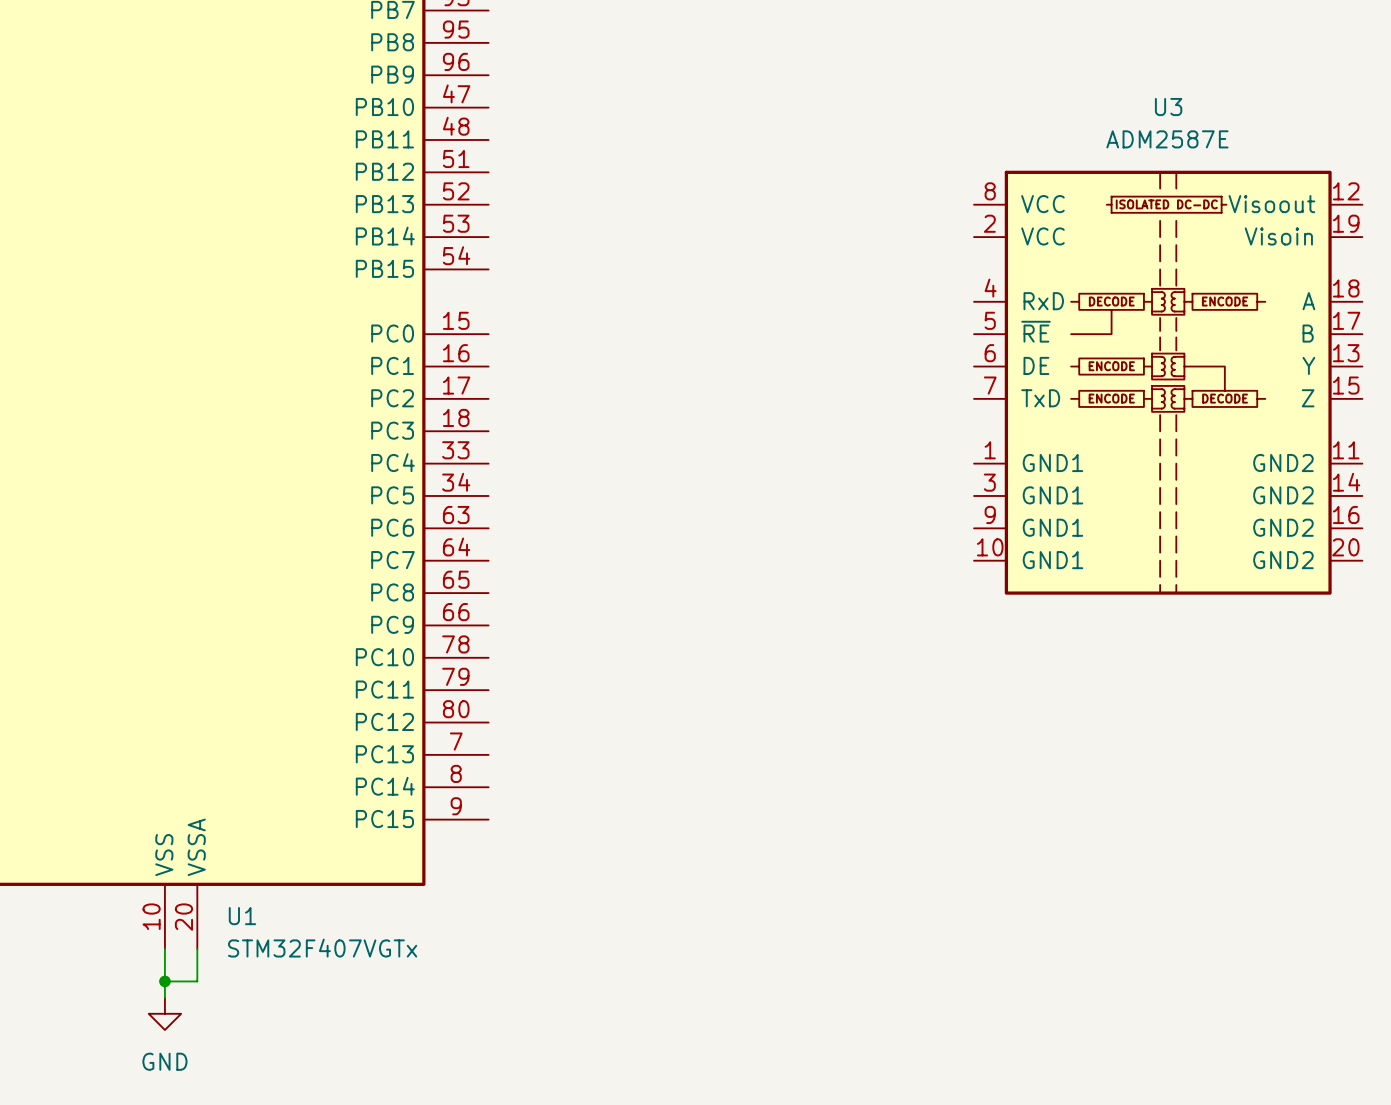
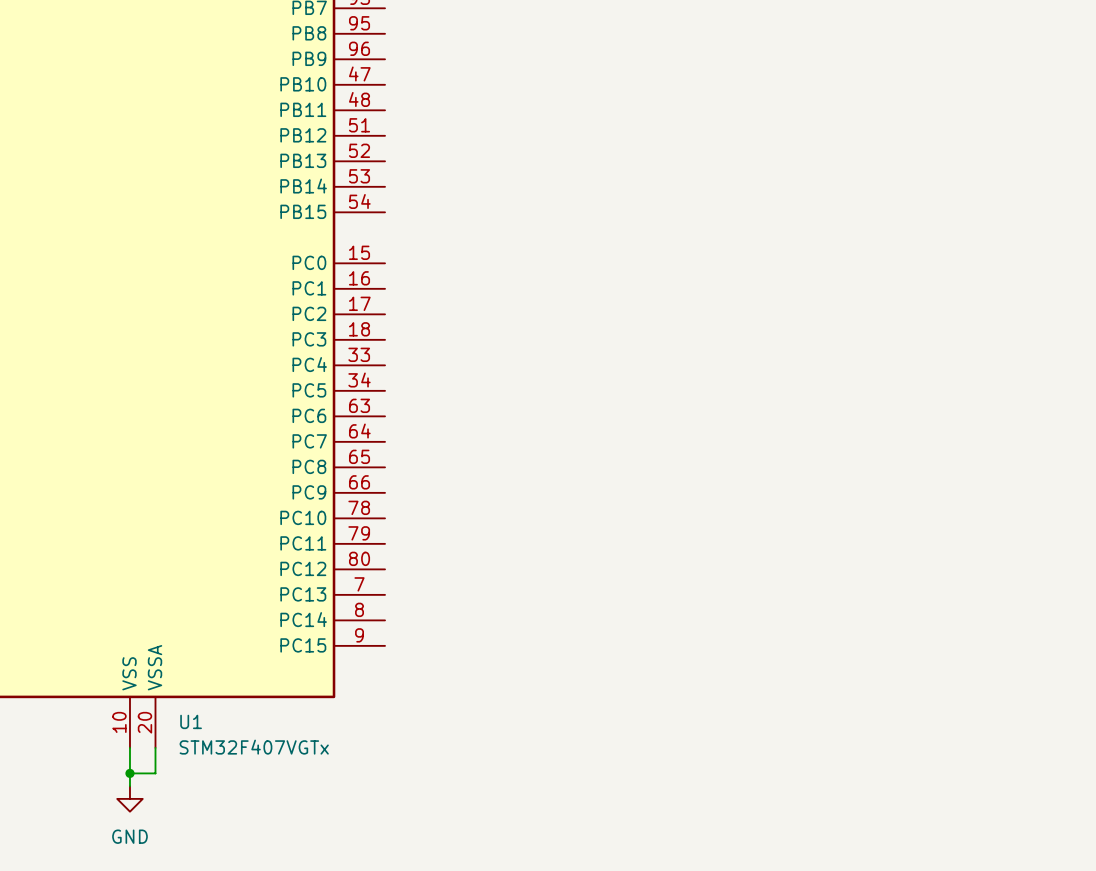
U3: ADM2587E (1168, 382) -> none

